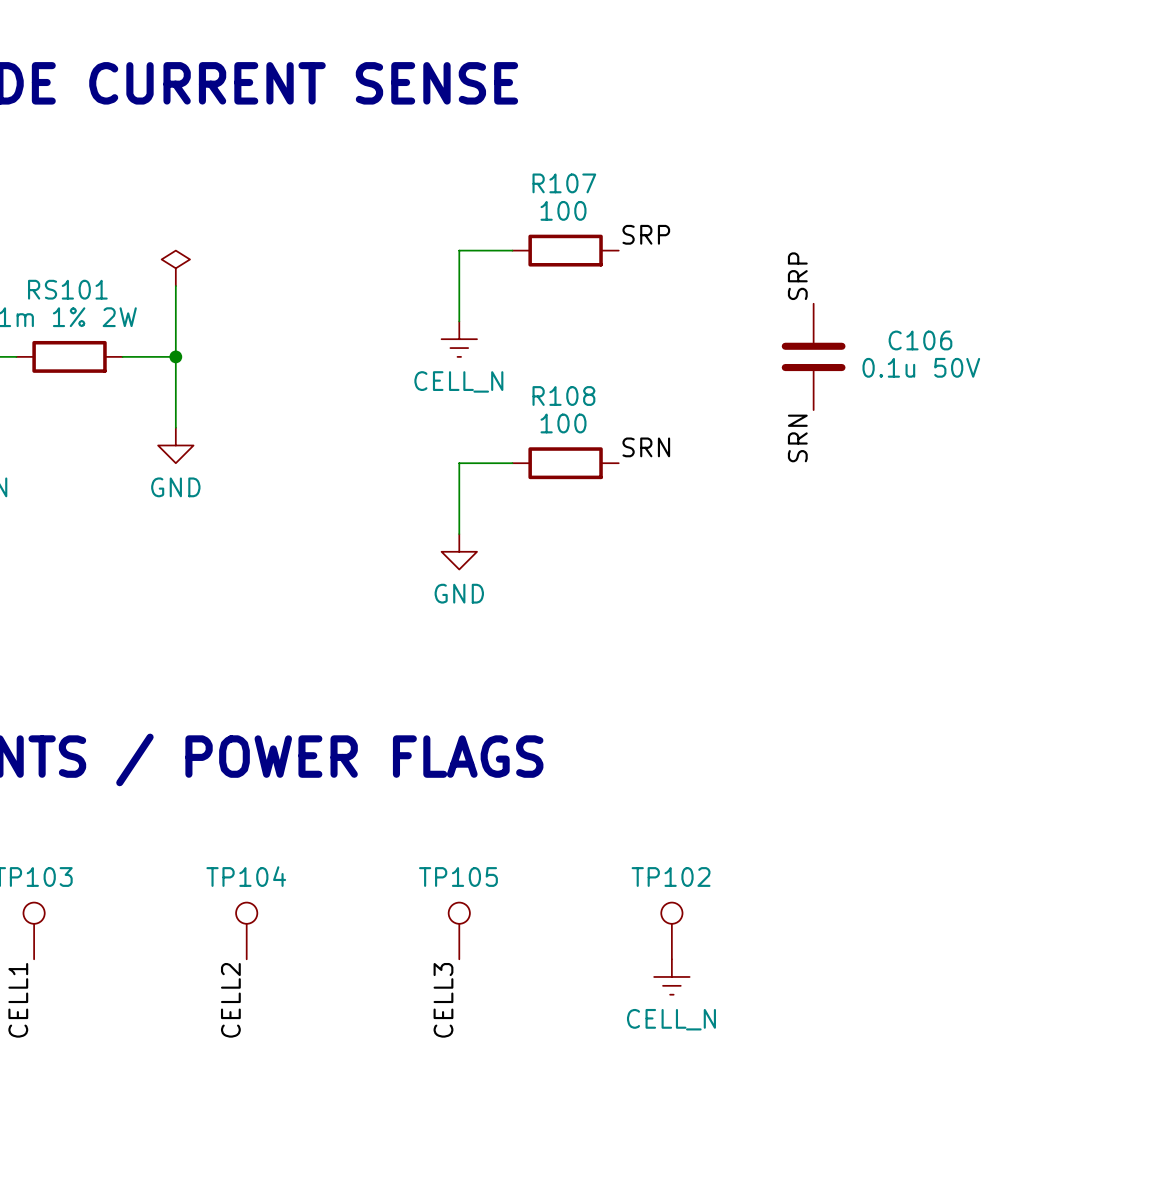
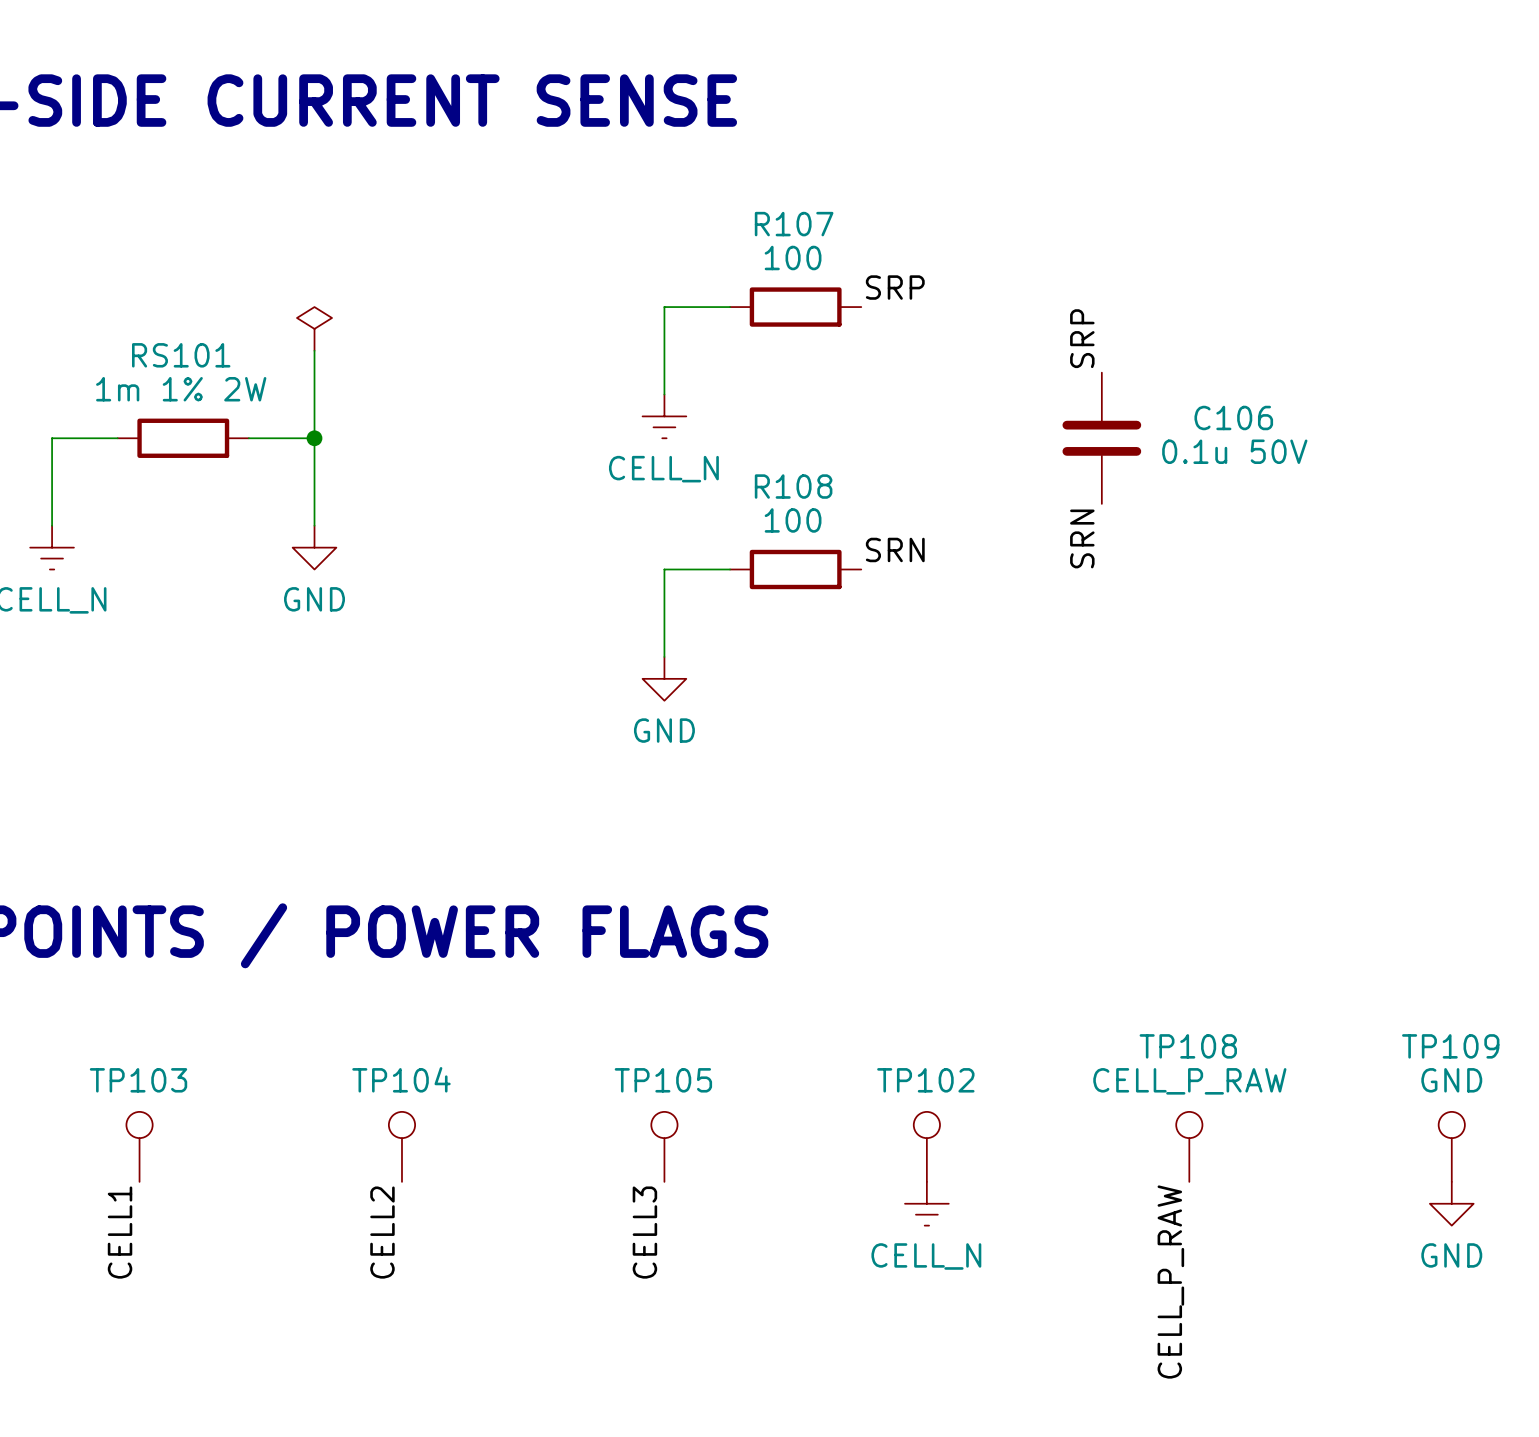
TP108: none -> CELL_P_RAW (1189, 1146)
TP109: none -> GND (1451, 1146)
power symbol: none -> GND (1451, 1203)
label: none -> CELL_P_RAW (1170, 1282)

